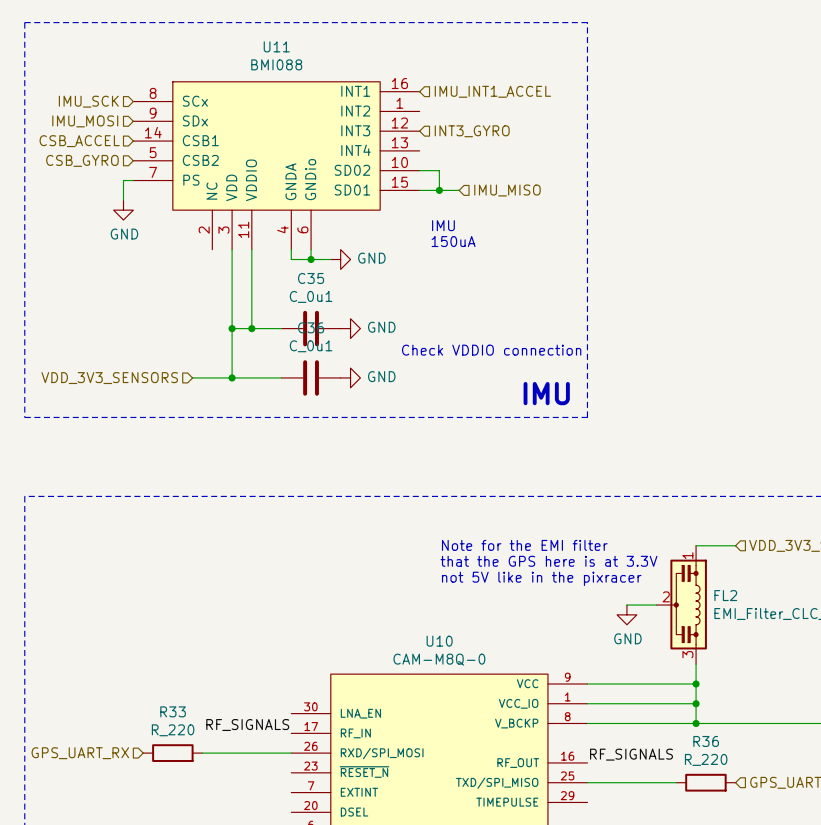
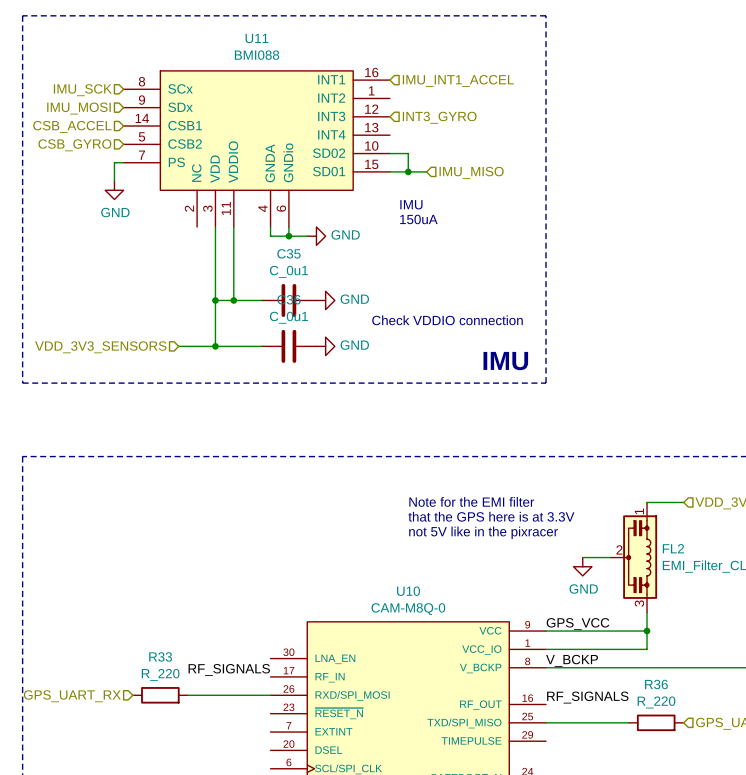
label: none -> GPS_VCC (577, 624)
wire: (696, 703) (696, 723) -> none
junction: (696, 703) -> none
label: none -> V_BCKP (572, 660)
junction: (696, 723) -> none

